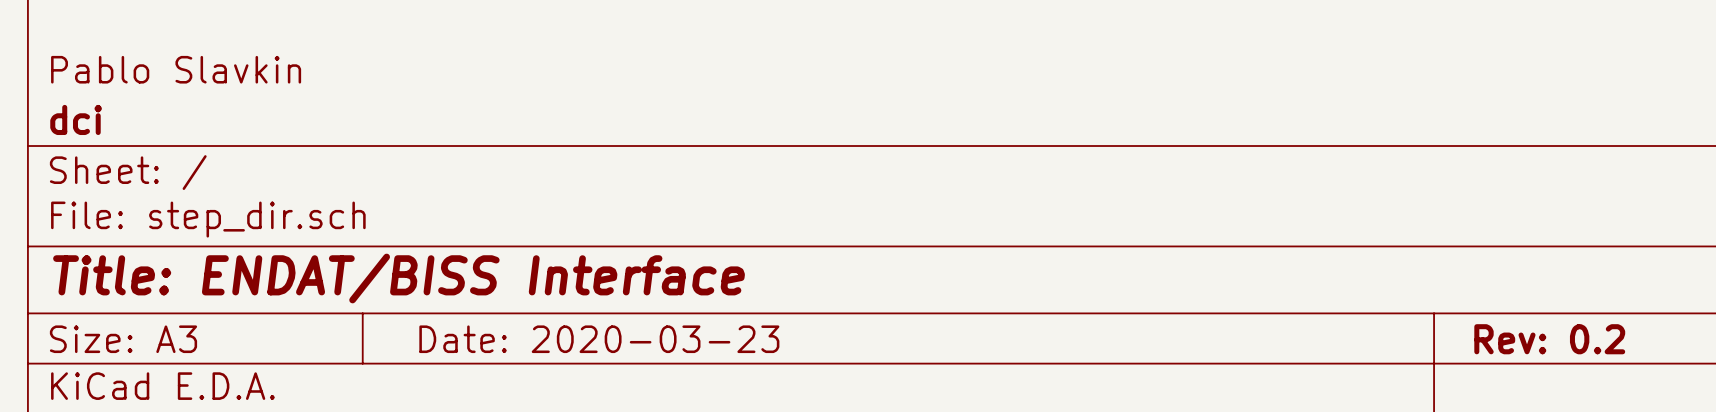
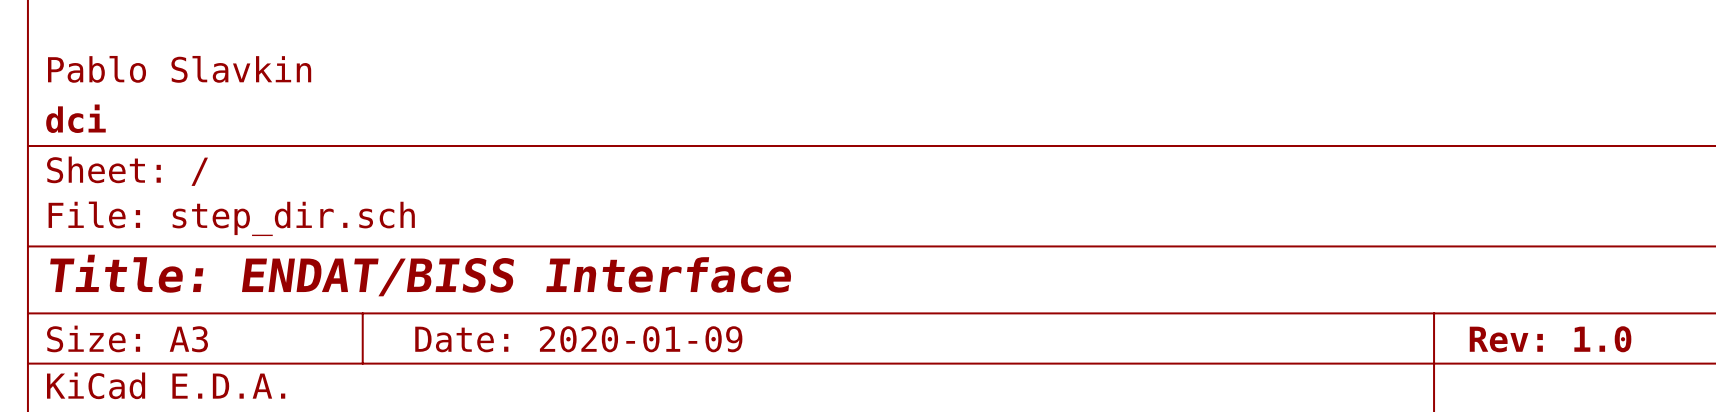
title block: Date: 2020-03-23 (599, 339) -> Date: 2020-01-09 (578, 339)
title block: Rev: 0.2 (1549, 339) -> Rev: 1.0 (1550, 339)

